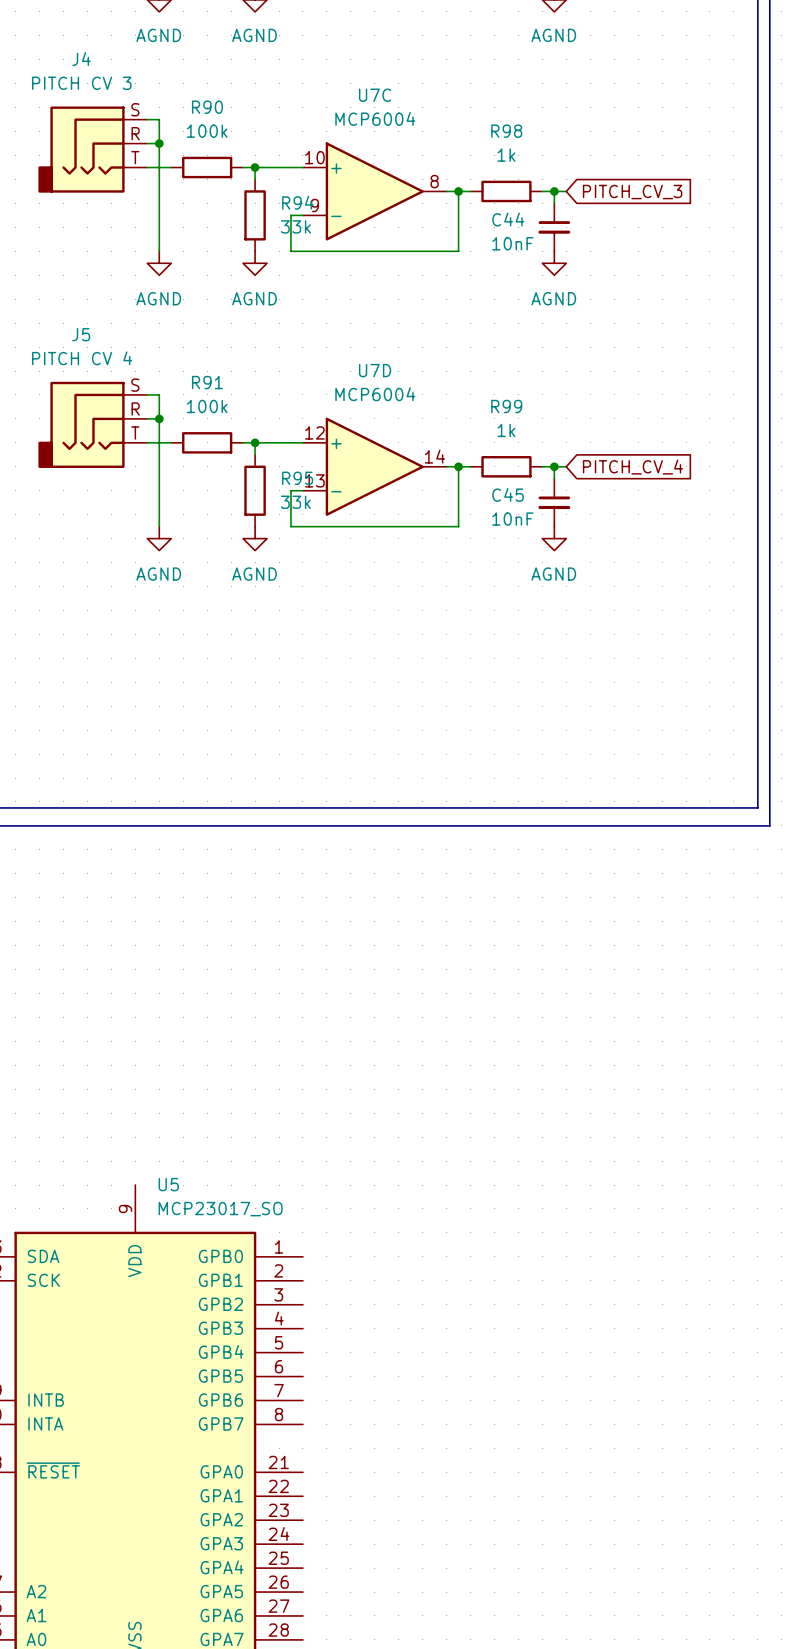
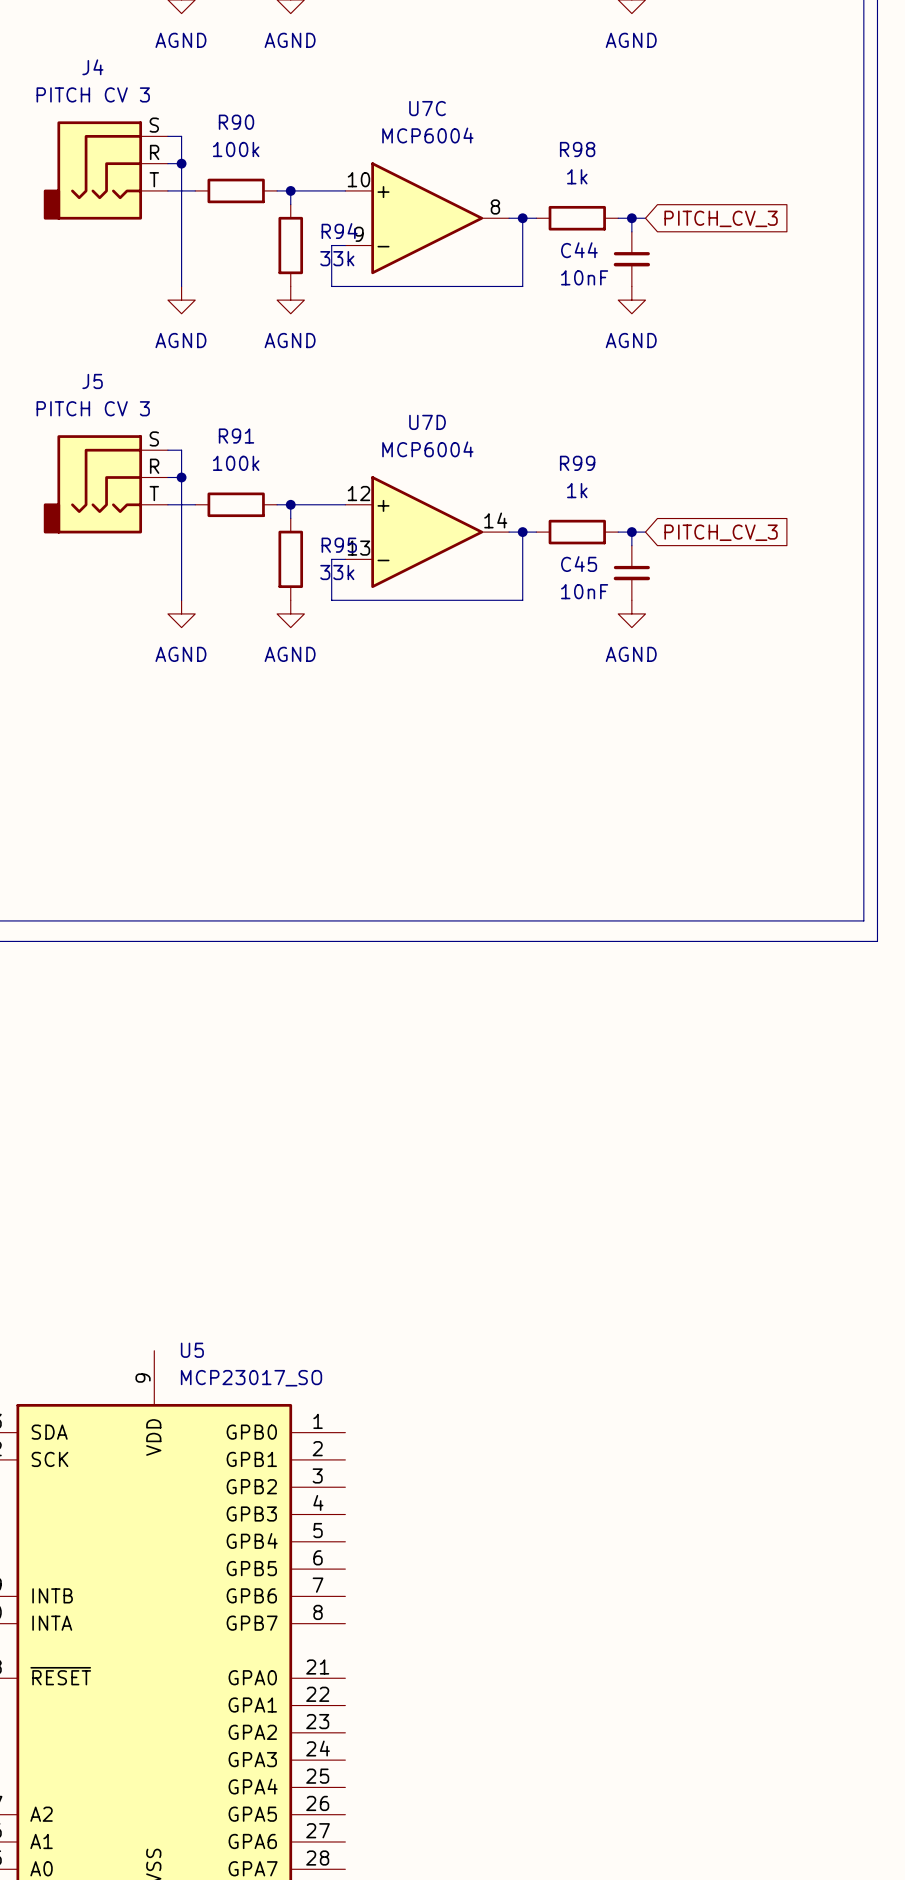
J5 value: PITCH CV 4 (82, 358) -> PITCH CV 3 (93, 408)
global label: PITCH_CV_4 (632, 467) -> PITCH_CV_3 (721, 532)

